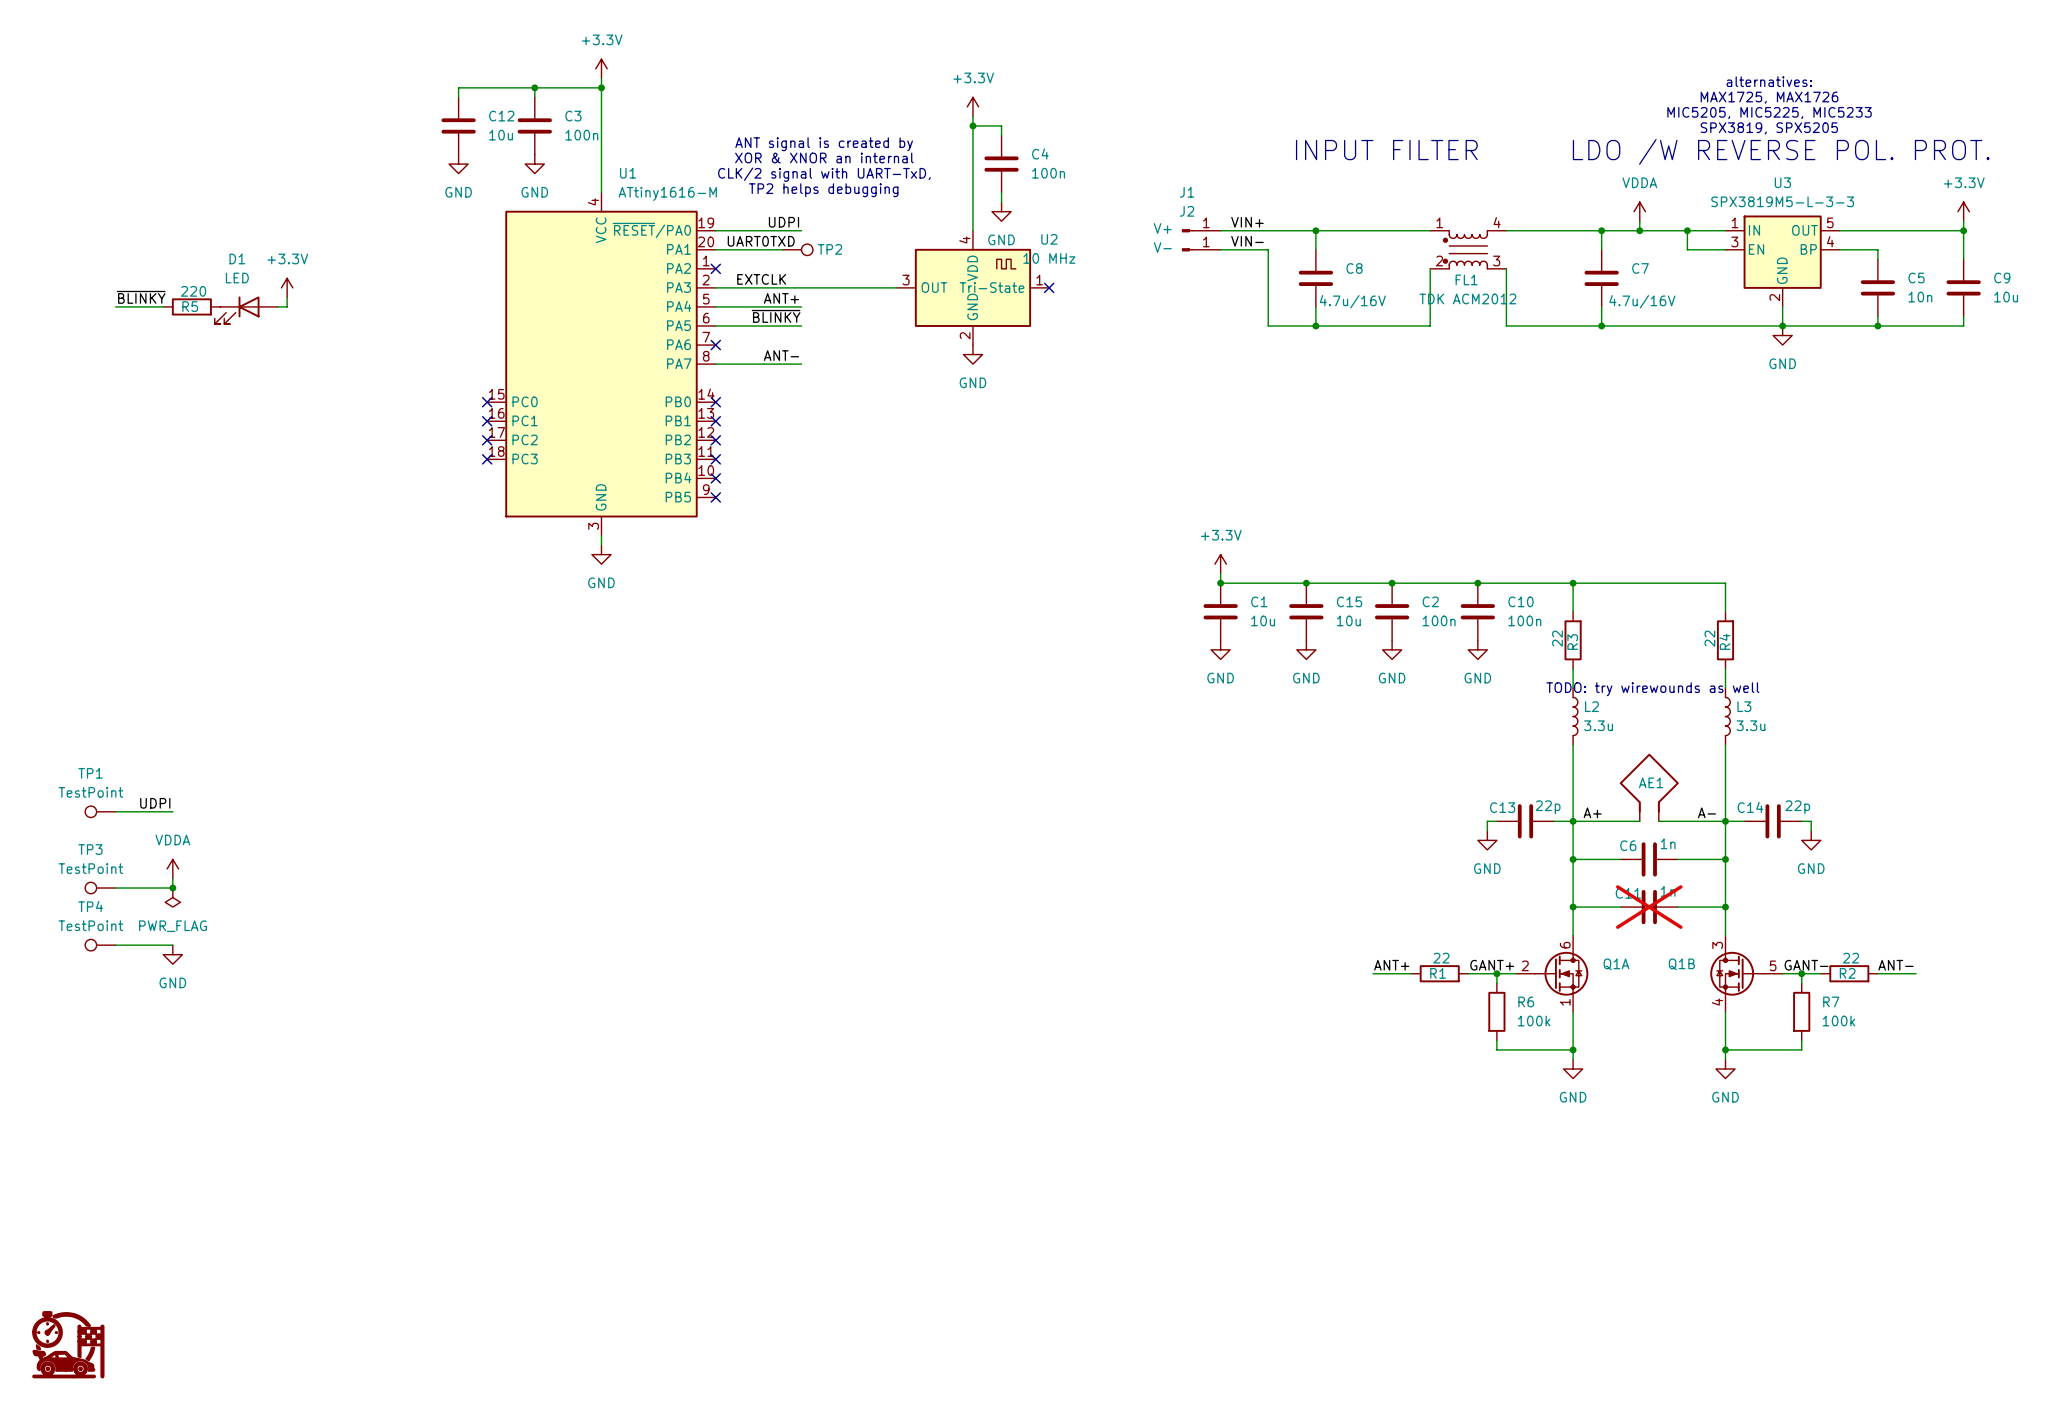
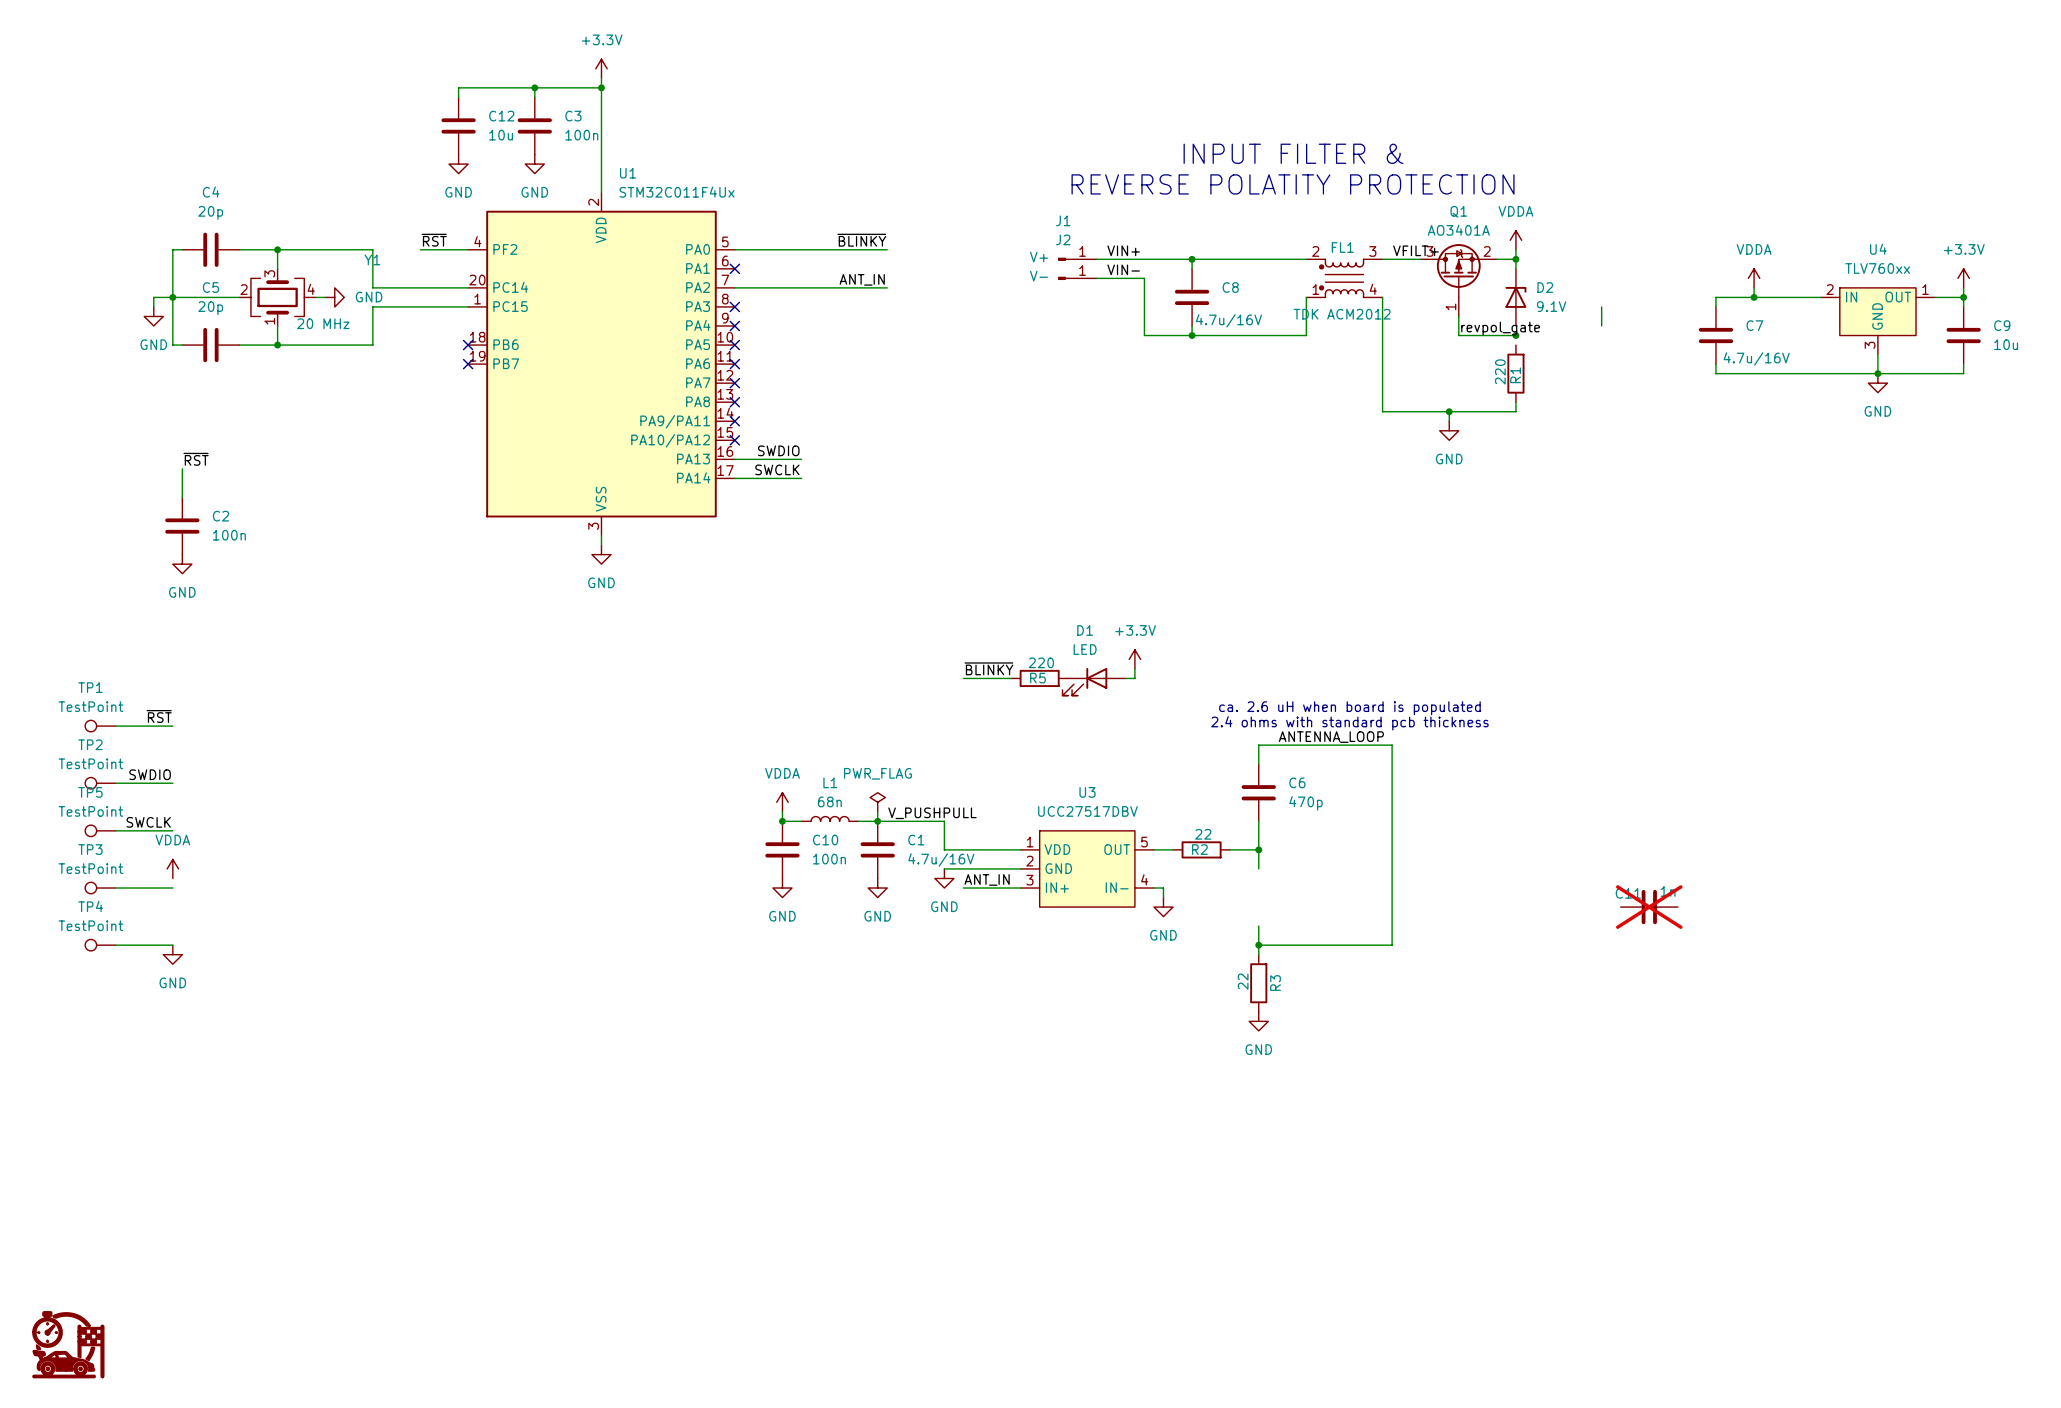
text: alternatives: (1769, 81) -> none
text: MAX1725, MAX1726 (1769, 97) -> none
power symbol: +3.3V (972, 106) -> none
text: MIC5205, MIC5225, MIC5233 (1769, 113) -> none
wire: (972, 116) (972, 230) -> none
wire: (972, 125) (1001, 125) (1001, 135) -> none
junction: (972, 125) -> none
text: SPX3819, SPX5205 (1769, 128) -> none
text: ANT signal is created by (824, 144) -> none
text: INPUT FILTER (1386, 150) -> INPUT FILTER & (1293, 153)
text: LDO /W REVERSE POL. PROT. (1781, 151) -> none
C4 name position: C4 (1040, 153) -> C4 (211, 192)
text: XOR & XNOR an internal (824, 157) -> none
C4 rotation: 0° (1001, 164) -> 90° clockwise (210, 249)
C4 position: (1001, 164) -> (210, 249)
C4 value: 100n (1048, 173) -> 20p (210, 212)
text: CLK/2 signal with UART-TxD, (824, 174) -> none
text: none -> REVERSE POLATITY PROTECTION (1293, 184)
text: TP2 helps debugging (823, 190) -> none
U1 symbol: [487, 192, 716, 536] -> [468, 192, 735, 536]
wire: (1001, 192) (1001, 202) -> none
U1 value: ATtiny1616-M (667, 193) -> STM32C011F4Ux (677, 192)
U3 value: SPX3819M5-L-3-3 (1782, 201) -> UCC27517DBV (1087, 811)
power symbol: GND (1001, 211) -> none
power symbol: VDDA (1639, 211) -> none
power symbol position: +3.3V (1963, 211) -> +3.3V (1963, 278)
U3 symbol: [1725, 215, 1840, 307] -> [1020, 830, 1154, 908]
wire: (1639, 221) (1639, 230) -> none
wire: (1963, 221) (1963, 259) -> none
label: UDPI (783, 222) -> none
label position: VIN+ (1247, 222) -> VIN+ (1123, 250)
wire: (715, 230) (801, 230) -> none
J1 position: (1201, 230) -> (1077, 259)
wire: (1220, 230) (1430, 230) -> (1096, 259) (1306, 259)
wire: (1315, 230) (1315, 249) -> none
junction: (1315, 230) -> none
wire: (1506, 230) (1725, 230) -> none
wire: (1601, 230) (1601, 249) -> (1515, 249) (1515, 268)
junction: (1601, 230) -> none
junction: (1639, 230) -> none
wire: (1687, 230) (1687, 249) (1725, 249) -> none
junction: (1687, 230) -> none
wire: (1839, 230) (1963, 230) -> none
junction: (1963, 230) -> none
label: none -> ~{RST} (434, 240)
power symbol: none -> VDDA (1515, 240)
label: UART0TXD (761, 241) -> none
label position: VIN- (1247, 241) -> VIN- (1123, 269)
wire: none -> (182, 249) (172, 249) (172, 345) (182, 345)
wire: none -> (239, 249) (372, 249) (372, 287) (468, 287)
wire: none -> (277, 249) (277, 268)
junction: none -> (277, 249)
wire: none -> (420, 249) (468, 249)
wire: none -> (782, 249) (887, 249)
TP2 position: (797, 249) -> (100, 783)
TP2 rotation: 0° (807, 249) -> 180° (90, 783)
TP2 name position: TP2 (829, 249) -> TP2 (90, 744)
J2 position: (1201, 249) -> (1077, 278)
wire: (1220, 249) (1268, 249) (1268, 326) (1430, 326) (1430, 268) -> none
FL1 flip: as is (1465, 249) -> up-down (1341, 278)
FL1 position: (1468, 249) -> (1344, 278)
wire: (1839, 249) (1877, 249) (1877, 259) -> none
label: none -> VFILT+ (1415, 250)
wire: none -> (1192, 259) (1192, 268)
junction: none -> (1192, 259)
wire: none -> (1382, 259) (1420, 259)
wire: none -> (1496, 259) (1515, 259)
junction: none -> (1515, 259)
no-connect mark position: (715, 268) -> (734, 268)
wire: (1506, 268) (1506, 326) (1963, 326) (1963, 316) -> none
wire: none -> (1096, 278) (1144, 278) (1144, 335) (1306, 335) (1306, 297)
C8 position: (1315, 278) -> (1192, 297)
C7 position: (1601, 278) -> (1715, 335)
power symbol: none -> VDDA (1754, 278)
C5 name position: C5 (1916, 278) -> C5 (210, 287)
label: EXTCLK (761, 279) -> none
label: none -> ANT_IN (862, 279)
Q1: none -> AO3401A (1458, 280)
power symbol: +3.3V (287, 287) -> none
wire: (887, 287) (896, 287) -> none
U2: 10 MHz (972, 287) -> none
no-connect mark: (1049, 287) -> none
C5 rotation: 0° (1877, 287) -> 90° clockwise (210, 345)
C5 position: (1877, 287) -> (210, 345)
C9 position: (1963, 287) -> (1963, 335)
label: ~{BLINKY} (141, 297) -> none
junction: none -> (172, 297)
wire: none -> (239, 297) (153, 297) (153, 306)
Y1: none -> 20 MHz (277, 297)
wire: (287, 297) (287, 306) (277, 306) -> none
wire: none -> (315, 297) (325, 297)
power symbol: none -> GND (334, 297)
wire: none -> (1382, 297) (1382, 411) (1515, 411) (1515, 402)
D2: none -> 9.1V (1515, 297)
wire: none -> (1820, 297) (1715, 297) (1715, 306)
C5 value: 10n (1920, 297) -> 20p (210, 308)
wire: none -> (1935, 297) (1963, 297)
junction: none -> (1963, 297)
label: ANT+ (781, 298) -> none
wire: (115, 306) (163, 306) -> none
R5 position: (191, 306) -> (1039, 678)
wire: none -> (468, 306) (372, 306) (372, 345) (239, 345)
wire: (715, 306) (801, 306) -> none
no-connect mark: none -> (734, 306)
wire: (1315, 306) (1315, 326) -> none
wire: (1782, 306) (1782, 326) -> (1877, 354) (1877, 373)
D1 position: (246, 310) -> (1093, 681)
power symbol: none -> GND (153, 316)
label position: ~{BLINKY} (776, 316) -> ~{BLINKY} (861, 240)
wire: none -> (1458, 316) (1458, 335) (1515, 335)
U4: none -> TLV760xx (1877, 321)
wire: none -> (277, 326) (277, 345)
wire: (715, 326) (801, 326) -> none
no-connect mark: none -> (734, 326)
wire: none -> (1192, 326) (1192, 335)
junction: (1315, 326) -> none
junction: (1601, 326) -> none
junction position: (1782, 326) -> (1754, 297)
junction: (1877, 326) -> none
label: none -> revpol_gate (1500, 328)
junction: none -> (1192, 335)
junction: none -> (1515, 335)
power symbol position: GND (1782, 335) -> GND (1877, 383)
junction: none -> (277, 345)
no-connect mark: none -> (468, 345)
no-connect mark: (715, 345) -> none
no-connect mark: none -> (734, 345)
power symbol: GND (972, 354) -> none
label: ANT- (781, 355) -> none
no-connect mark: none -> (468, 364)
wire: (715, 364) (801, 364) -> none
no-connect mark: none -> (734, 364)
wire: none -> (1715, 364) (1715, 373) (1963, 373) (1963, 364)
junction: none -> (1877, 373)
no-connect mark: none -> (734, 383)
no-connect mark: (487, 402) -> none
no-connect mark: (715, 402) -> none
no-connect mark: none -> (734, 402)
wire: none -> (1449, 411) (1449, 421)
junction: none -> (1449, 411)
no-connect mark: (487, 421) -> none
no-connect mark: (715, 421) -> none
no-connect mark: none -> (734, 421)
power symbol: none -> GND (1449, 430)
no-connect mark: (487, 440) -> none
no-connect mark: (715, 440) -> none
no-connect mark: none -> (734, 440)
label: none -> SWDIO (778, 450)
label: none -> ~{RST} (196, 459)
no-connect mark: (487, 459) -> none
no-connect mark: (715, 459) -> none
wire: none -> (734, 459) (801, 459)
wire: none -> (182, 468) (182, 497)
label: none -> SWCLK (777, 469)
no-connect mark: (715, 478) -> none
wire: none -> (734, 478) (801, 478)
no-connect mark: (715, 497) -> none
power symbol: none -> GND (182, 564)
power symbol position: +3.3V (1220, 564) -> +3.3V (1134, 659)
wire: (1220, 573) (1220, 583) (1725, 583) (1725, 611) -> none
junction: (1220, 583) -> none
junction: (1306, 583) -> none
junction: (1392, 583) -> none
junction: (1477, 583) -> none
wire: (1573, 583) (1573, 611) -> none
junction: (1573, 583) -> none
C1 position: (1220, 611) -> (877, 849)
C15: 10u (1306, 611) -> none
C2 position: (1392, 611) -> (182, 526)
C10 position: (1477, 611) -> (782, 849)
C1 value: 10u (1263, 620) -> 4.7u/16V (941, 859)
R3 position: (1573, 640) -> (1258, 983)
R4: 22 (1725, 640) -> none
R3 name position: R3 (1572, 642) -> R3 (1275, 983)
power symbol: GND (1220, 649) -> none
power symbol: GND (1306, 649) -> none
power symbol: GND (1392, 649) -> none
power symbol: GND (1477, 649) -> none
label: none -> ~{BLINKY} (988, 668)
wire: none -> (1134, 668) (1134, 678) (1125, 678)
wire: (1573, 668) (1573, 687) -> none
wire: (1725, 668) (1725, 687) -> none
wire: none -> (963, 678) (1011, 678)
text: TODO: try wirewounds as well (1652, 689) -> none
text: none -> ca. 2.6 uH when board is populated (1349, 708)
label: none -> ~{RST} (159, 716)
L2: 3.3u (1575, 716) -> none
L3: 3.3u (1727, 716) -> none
text: none -> 2.4 ohms with standard pcb thickness (1349, 723)
wire: none -> (115, 726) (172, 726)
label: none -> ANTENNA_LOOP (1331, 737)
wire: (1573, 745) (1573, 935) -> none
wire: (1725, 745) (1725, 935) -> none
TP2 value: none -> TestPoint (90, 763)
wire: none -> (1258, 764) (1258, 745) (1392, 745) (1392, 945) (1258, 945)
label: none -> SWDIO (150, 774)
wire: none -> (115, 783) (172, 783)
AE1: (1649, 787) -> none
power symbol: none -> VDDA (782, 802)
power symbol: none -> PWR_FLAG (877, 802)
label: UDPI (155, 803) -> none
TP1 position: (100, 811) -> (100, 726)
wire: (115, 811) (172, 811) -> (115, 830) (172, 830)
wire: none -> (782, 811) (782, 821) (801, 821)
wire: none -> (877, 811) (877, 821)
label: A+ (1592, 812) -> none
label: A- (1706, 812) -> none
label: none -> V_PUSHPULL (932, 813)
L1: none -> 68n (830, 818)
junction: none -> (782, 821)
wire: none -> (858, 821) (944, 821) (944, 849) (1020, 849)
junction: none -> (877, 821)
wire: none -> (1258, 821) (1258, 868)
wire: (1496, 821) (1487, 821) (1487, 830) -> none
C13: 22p (1525, 821) -> none
wire: (1554, 821) (1639, 821) -> none
junction: (1573, 821) -> none
wire: (1658, 821) (1744, 821) -> none
junction: (1725, 821) -> none
C14: 22p (1773, 821) -> none
wire: (1801, 821) (1811, 821) (1811, 830) -> none
label: none -> SWCLK (148, 822)
TP5: none -> TestPoint (100, 830)
power symbol: GND (1487, 840) -> none
power symbol: GND (1811, 840) -> none
C6 value: 1n (1668, 843) -> 470p (1305, 803)
C6 name position: C6 (1628, 845) -> C6 (1297, 782)
wire: none -> (1153, 849) (1173, 849)
wire: none -> (1230, 849) (1258, 849)
junction: none -> (1258, 849)
wire: (1573, 859) (1620, 859) -> none
junction: (1573, 859) -> none
C6 rotation: 0° (1649, 859) -> 90° clockwise (1258, 792)
C6 position: (1649, 859) -> (1258, 792)
wire: (1677, 859) (1725, 859) -> none
junction: (1725, 859) -> none
wire: none -> (944, 868) (1020, 868)
wire: (172, 878) (172, 888) -> none
power symbol: none -> GND (944, 878)
label: none -> ANT_IN (987, 879)
junction: (172, 888) -> none
power symbol: none -> GND (782, 888)
power symbol: none -> GND (877, 888)
wire: none -> (963, 888) (1020, 888)
wire: none -> (1153, 888) (1163, 888) (1163, 897)
power symbol: PWR_FLAG (172, 897) -> none
power symbol: none -> GND (1163, 907)
wire: (1573, 907) (1620, 907) -> none
junction: (1573, 907) -> none
wire: (1677, 907) (1725, 907) -> none
junction: (1725, 907) -> none
wire: none -> (1258, 926) (1258, 954)
junction: none -> (1258, 945)
R1 value: 22 (1441, 958) -> 220 (1500, 371)
label: ANT+ (1391, 965) -> none
label: GANT+ (1492, 965) -> none
label: GANT- (1806, 965) -> none
label: ANT- (1895, 965) -> none
wire: (1373, 973) (1411, 973) -> none
R1 rotation: 0° (1439, 973) -> 90° clockwise (1515, 373)
R1 position: (1439, 973) -> (1515, 373)
wire: (1468, 973) (1515, 973) -> none
wire: (1496, 973) (1496, 983) -> none
junction: (1496, 973) -> none
Q1A: (1552, 973) -> none
Q1B: (1746, 973) -> none
wire: (1782, 973) (1820, 973) -> none
wire: (1801, 973) (1801, 983) -> none
junction: (1801, 973) -> none
R2 position: (1849, 973) -> (1201, 849)
wire: (1877, 973) (1916, 973) -> none
R6: 100k (1496, 1011) -> none
wire: (1573, 1011) (1573, 1059) -> none
wire: (1725, 1011) (1725, 1059) -> none
R7: 100k (1801, 1011) -> none
power symbol: none -> GND (1258, 1021)
wire: (1496, 1040) (1496, 1049) (1573, 1049) -> none
wire: (1801, 1040) (1801, 1049) (1725, 1049) -> none
junction: (1573, 1049) -> none
junction: (1725, 1049) -> none
power symbol: GND (1573, 1068) -> none
power symbol: GND (1725, 1068) -> none

